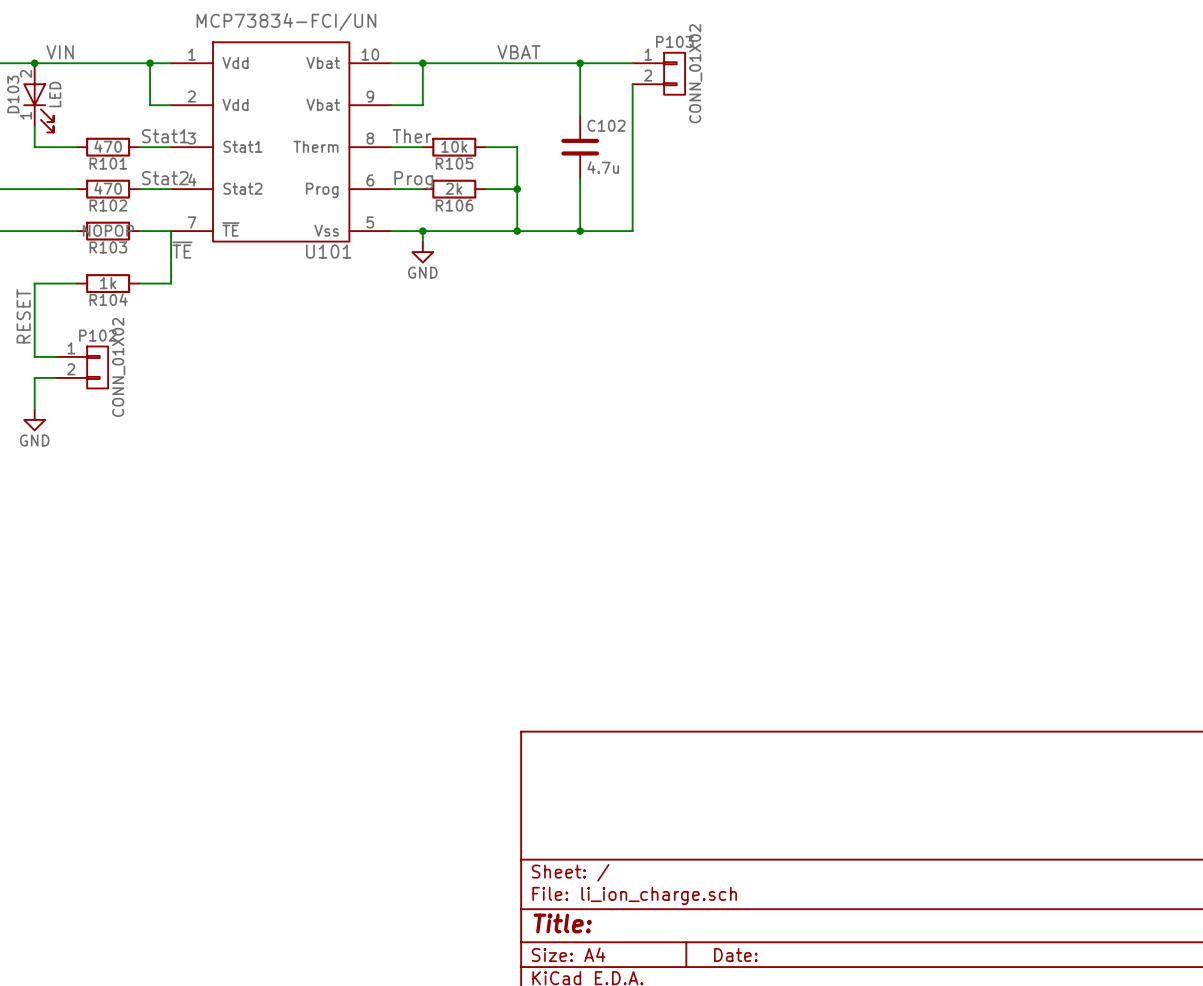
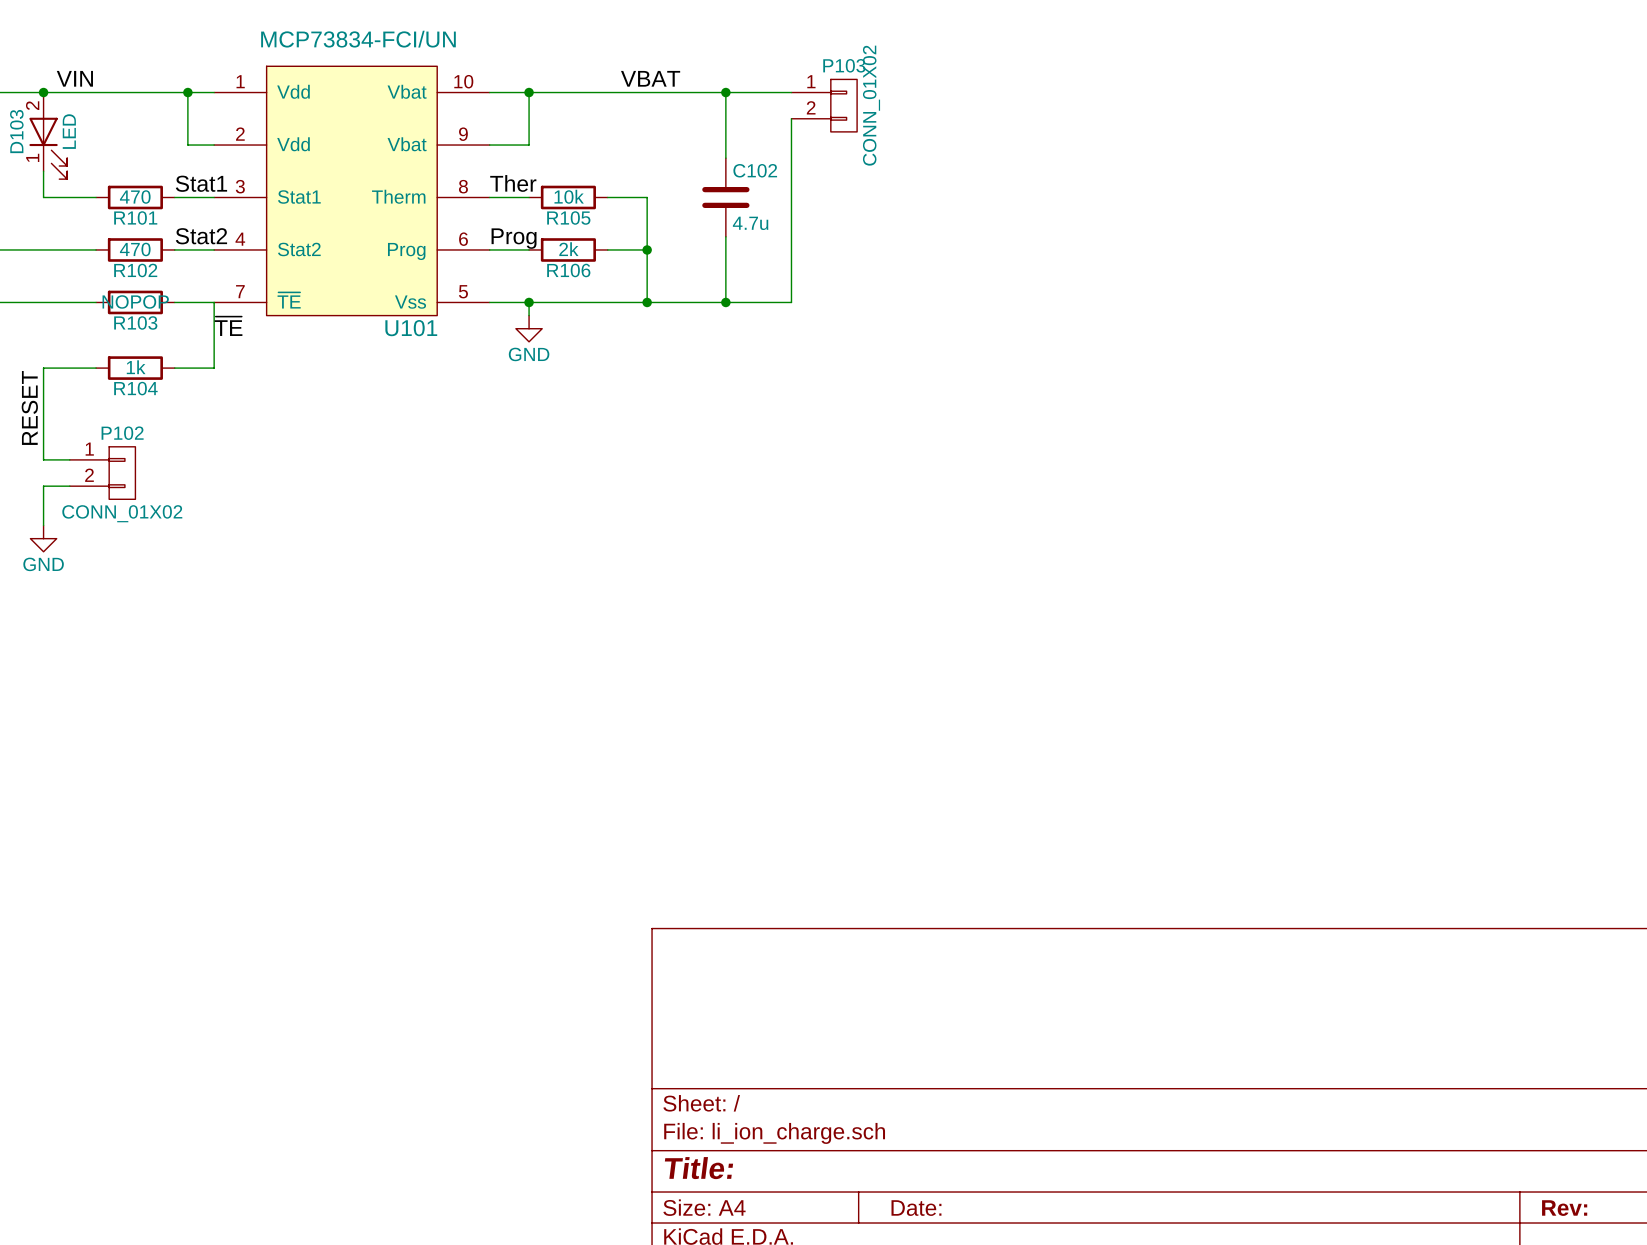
P102 value rotation: 0° (118, 367) -> 90° clockwise (122, 513)

